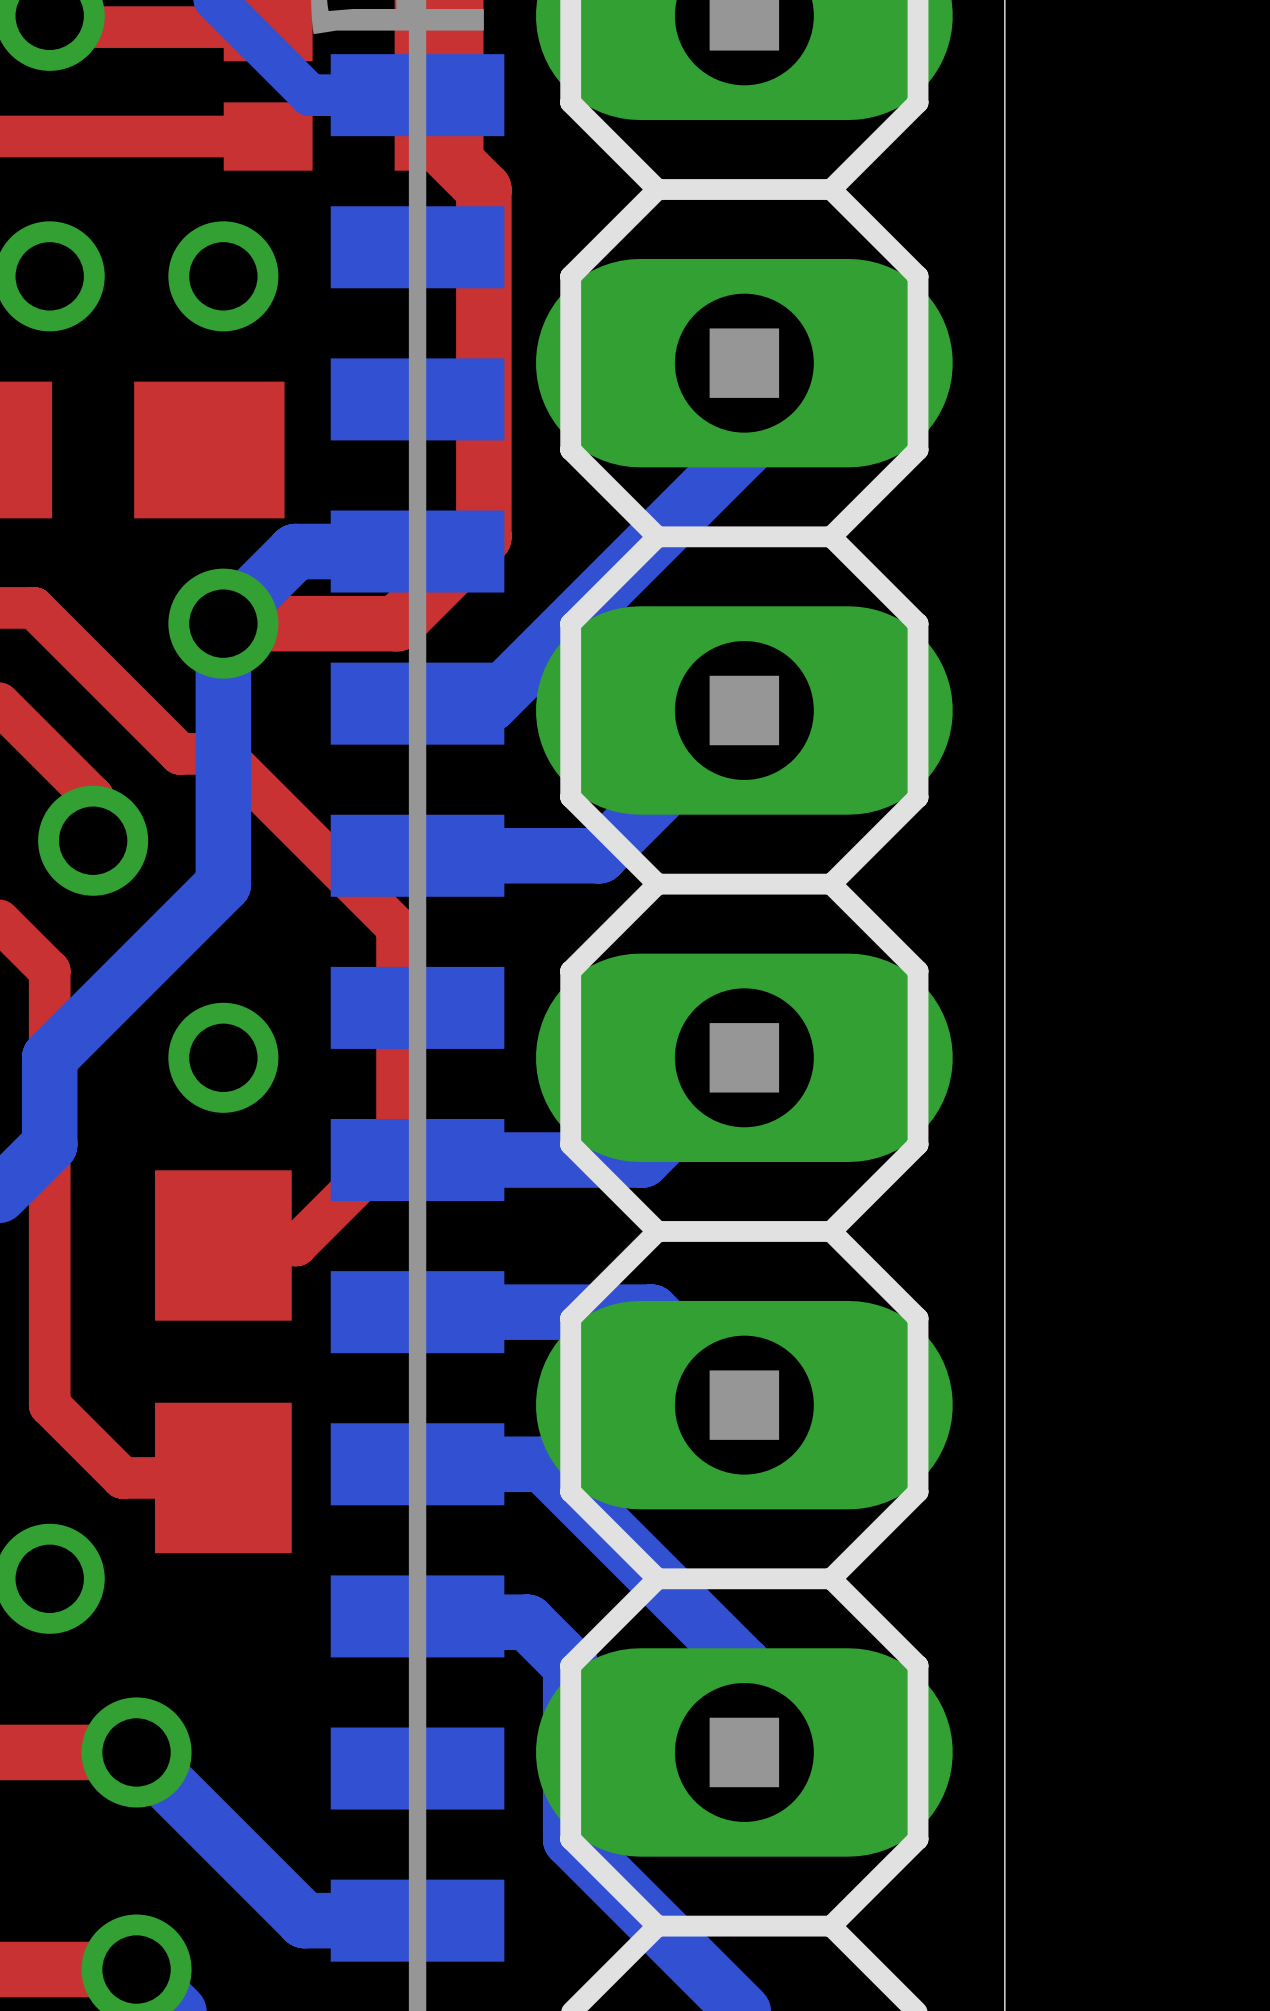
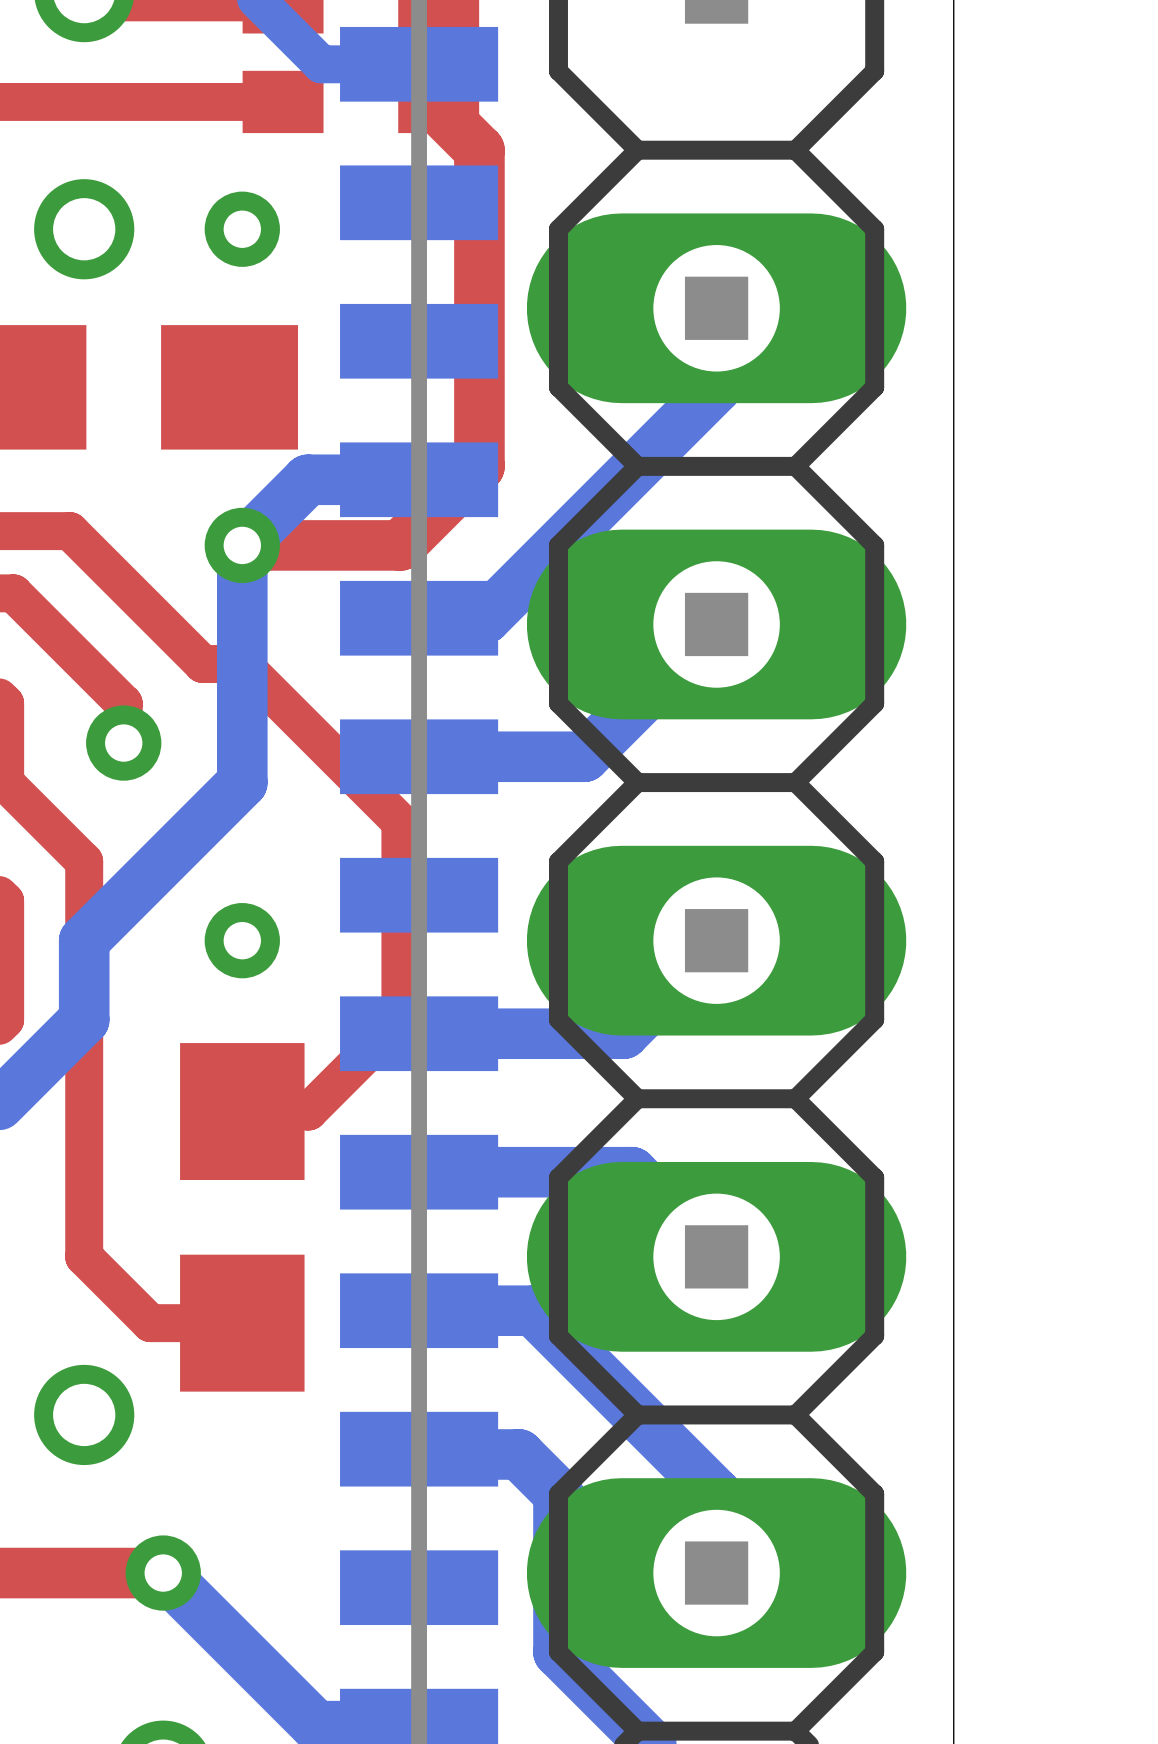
via size: [168, 221, 279, 332] -> [204, 191, 280, 267]
via size: [168, 568, 279, 679] -> [204, 507, 280, 584]
via size: [38, 785, 149, 896] -> [86, 705, 162, 781]
via size: [168, 1002, 279, 1113] -> [204, 903, 280, 979]
via size: [81, 1697, 192, 1808] -> [125, 1535, 201, 1611]

